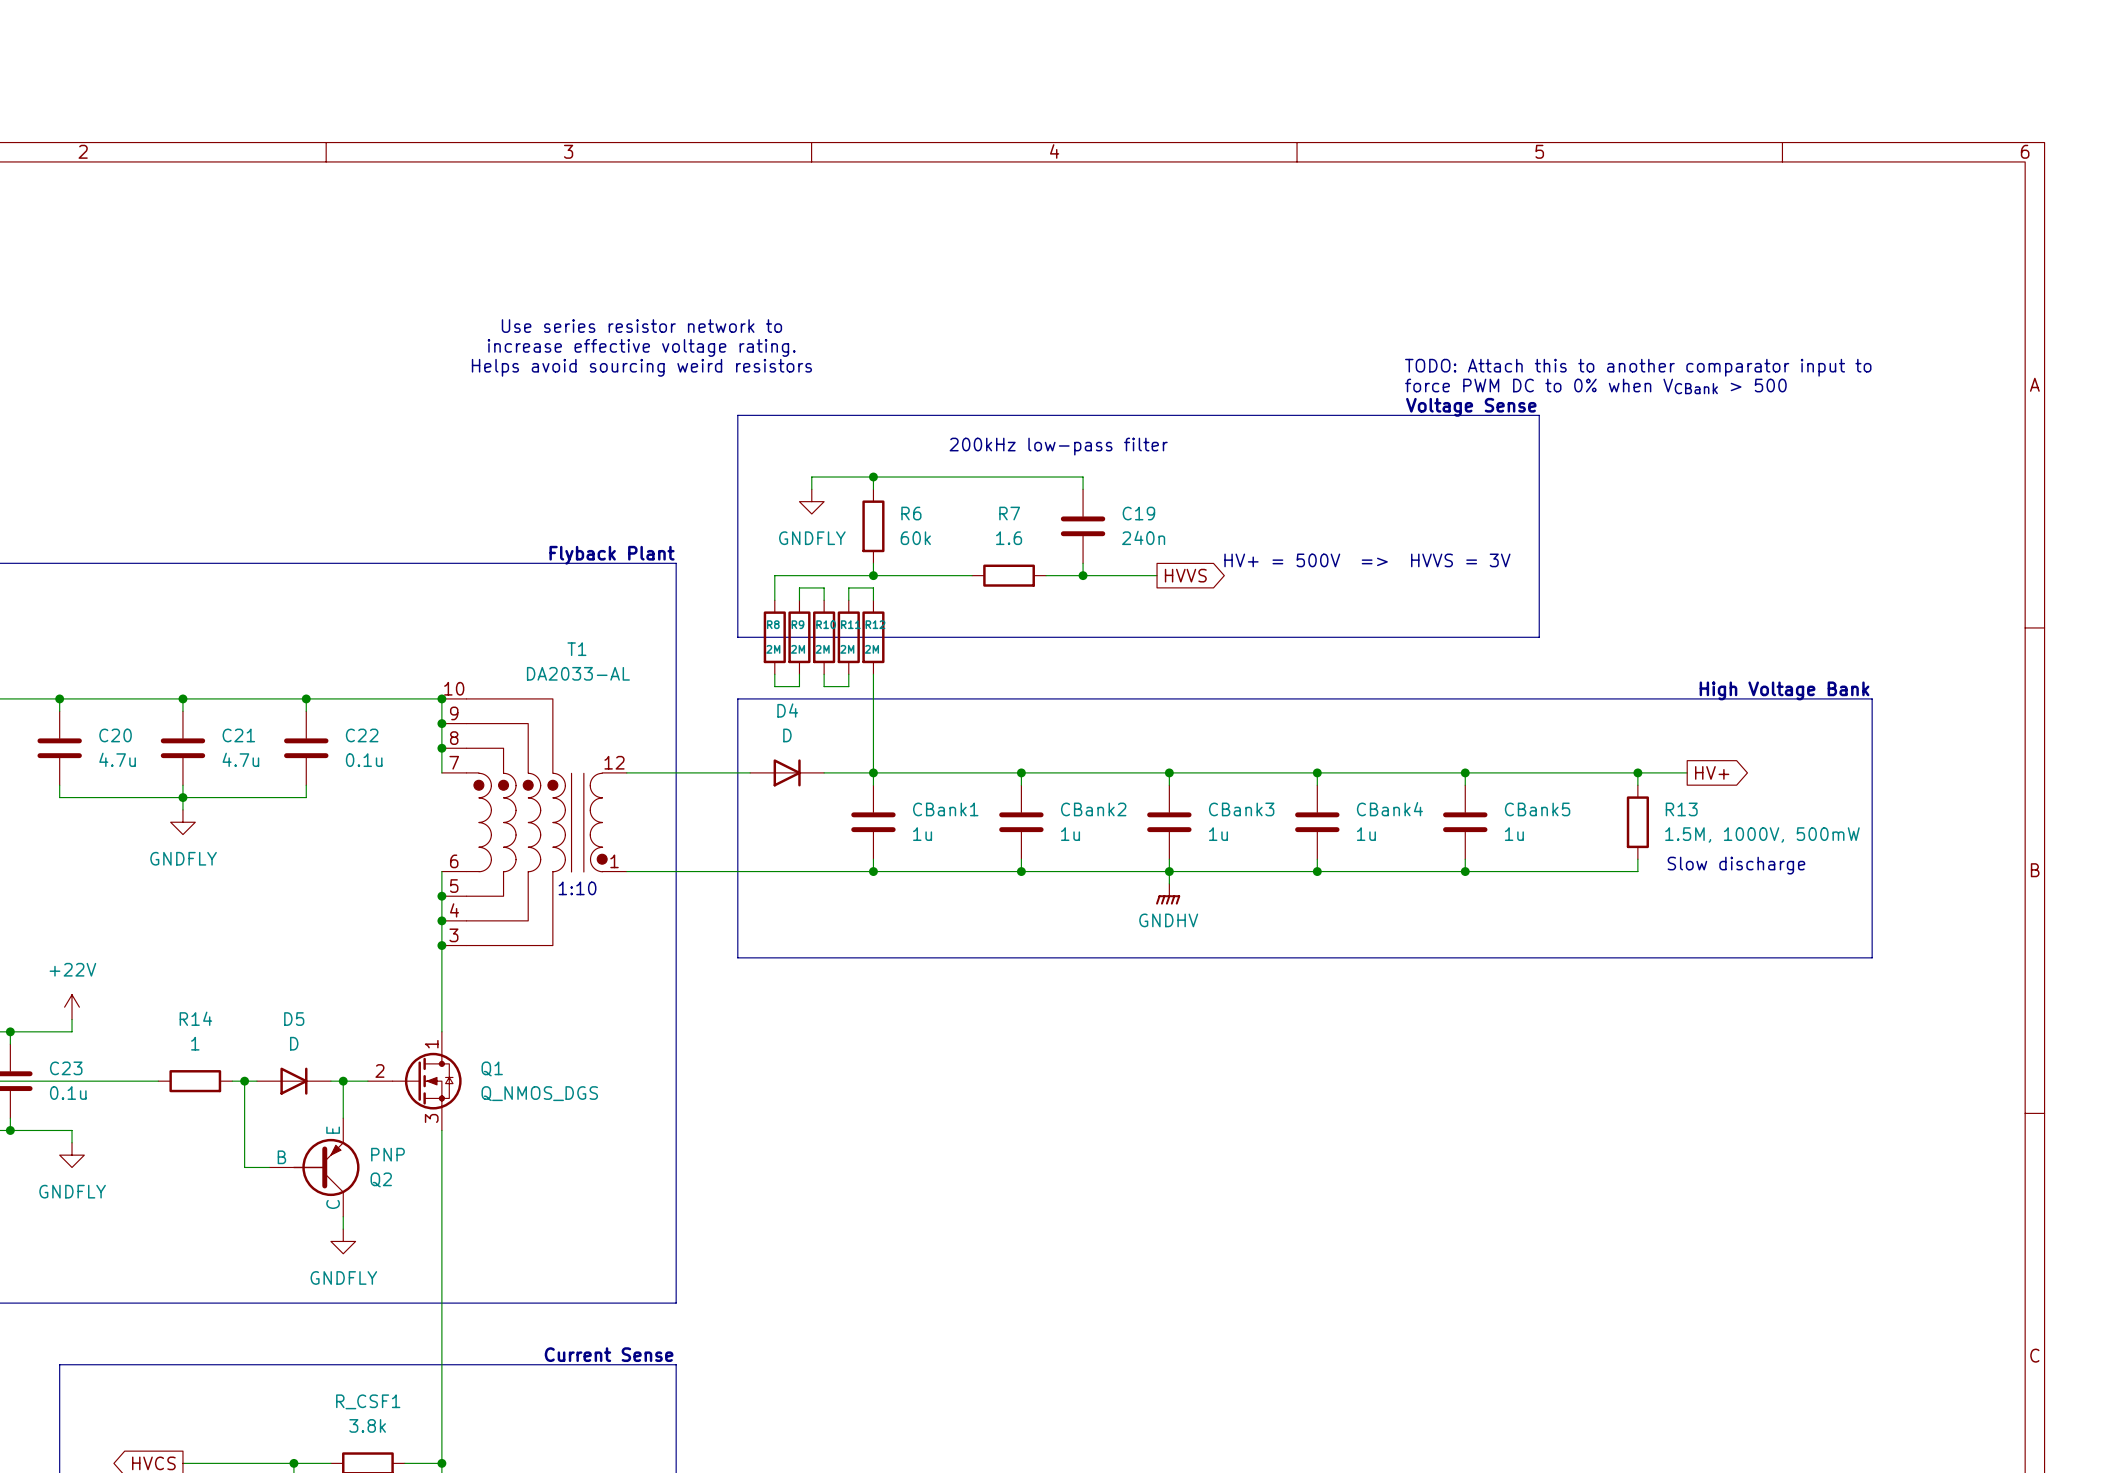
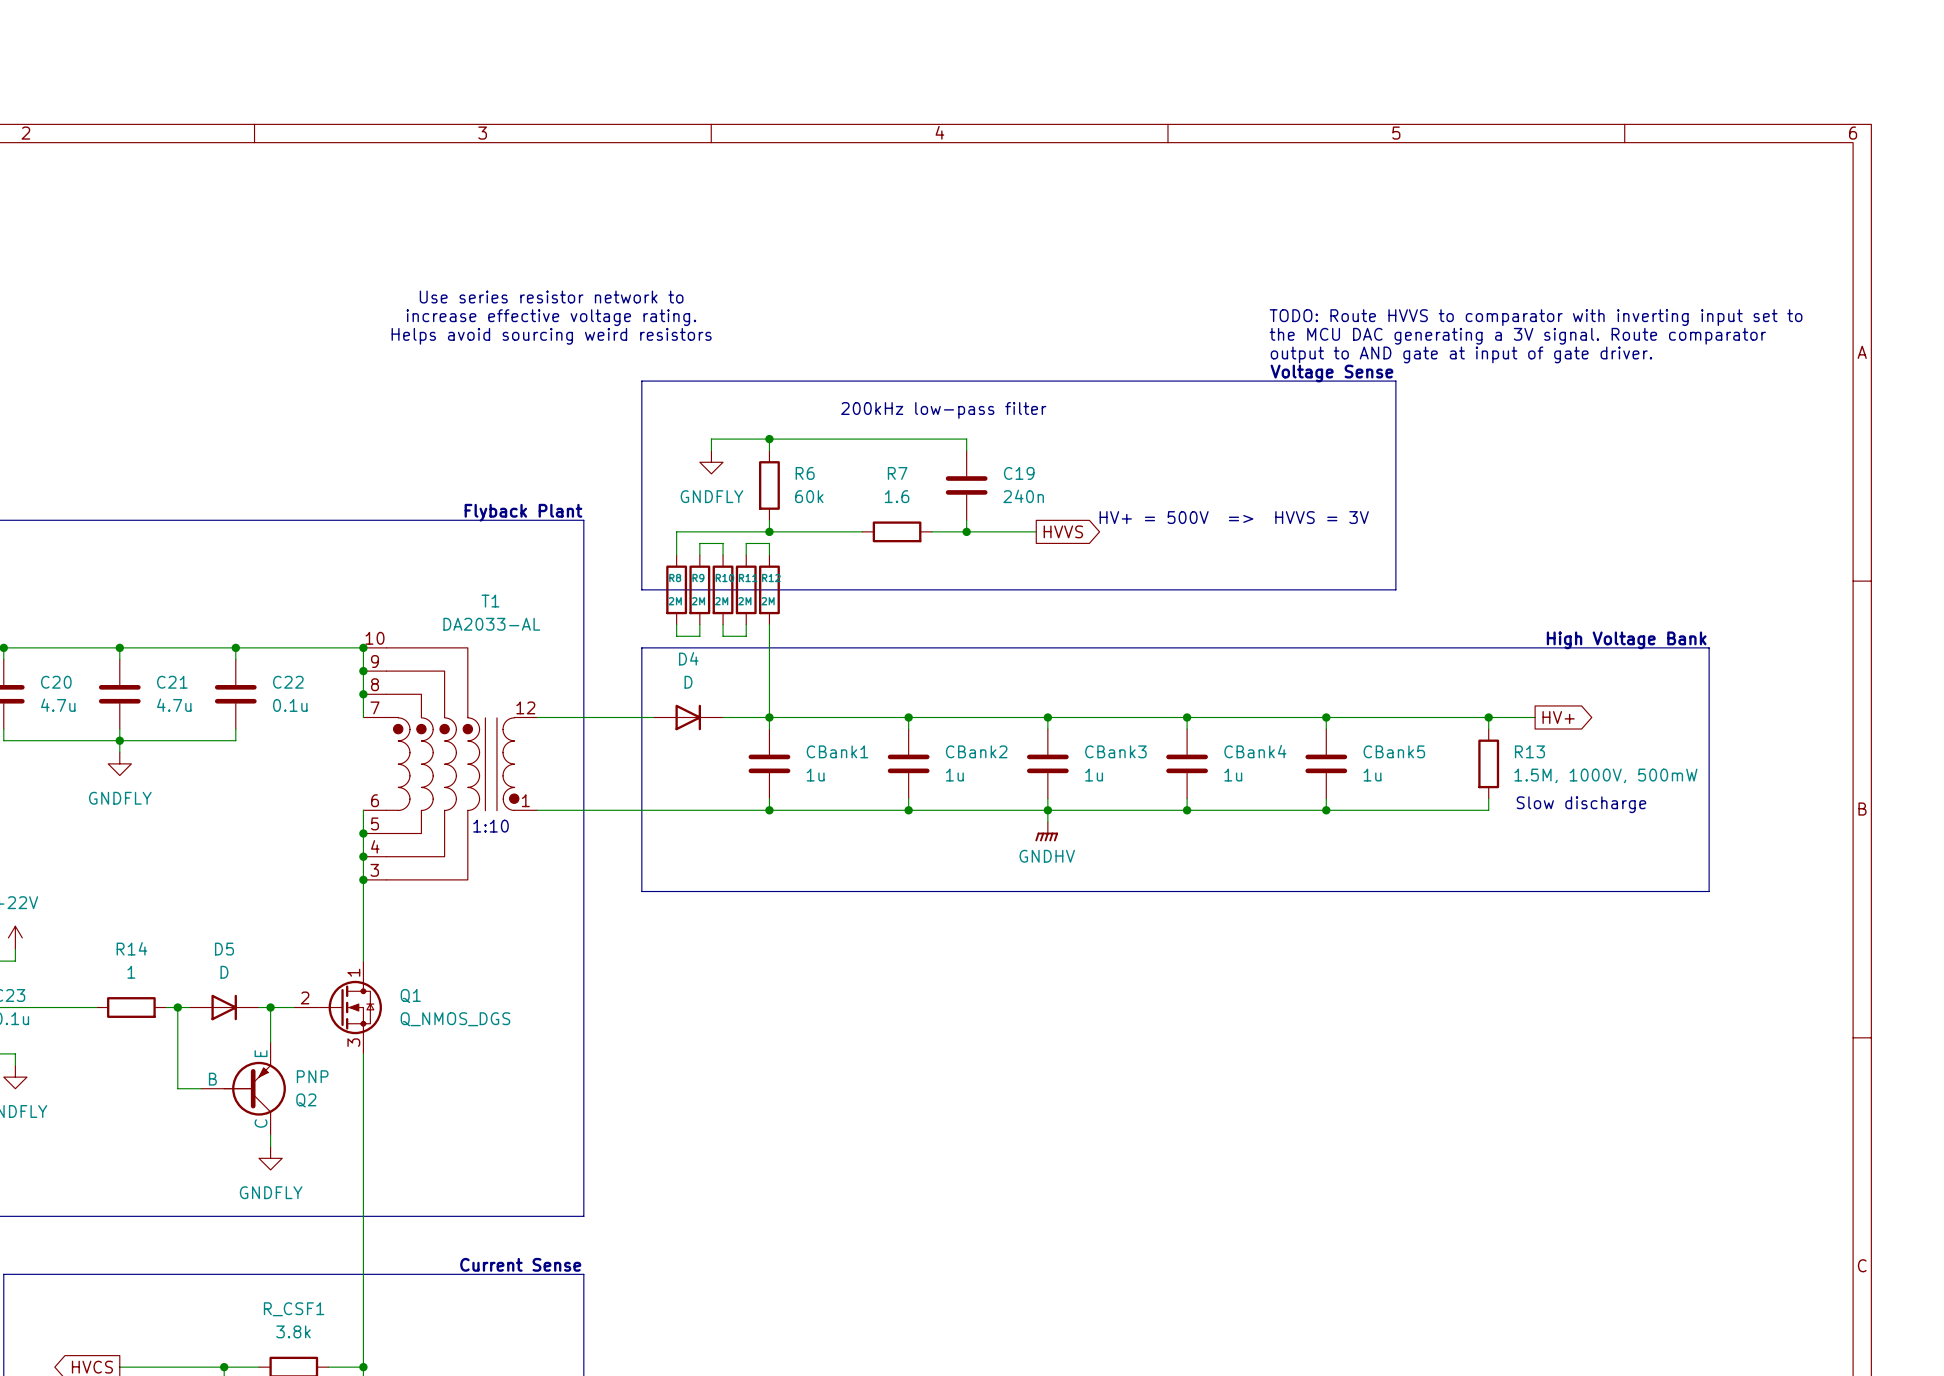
text: none -> TODO: Route HVVS to comparator with inverting input set to (1536, 317)
text: TODO: Attach this to another comparator input to (1638, 367) -> the MCU DAC generating a 3V signal. Route comparator (1517, 336)
text: force PWM DC to 0% when VCBank > 500 (1595, 386) -> output to AND gate at input of gate driver. (1461, 354)

